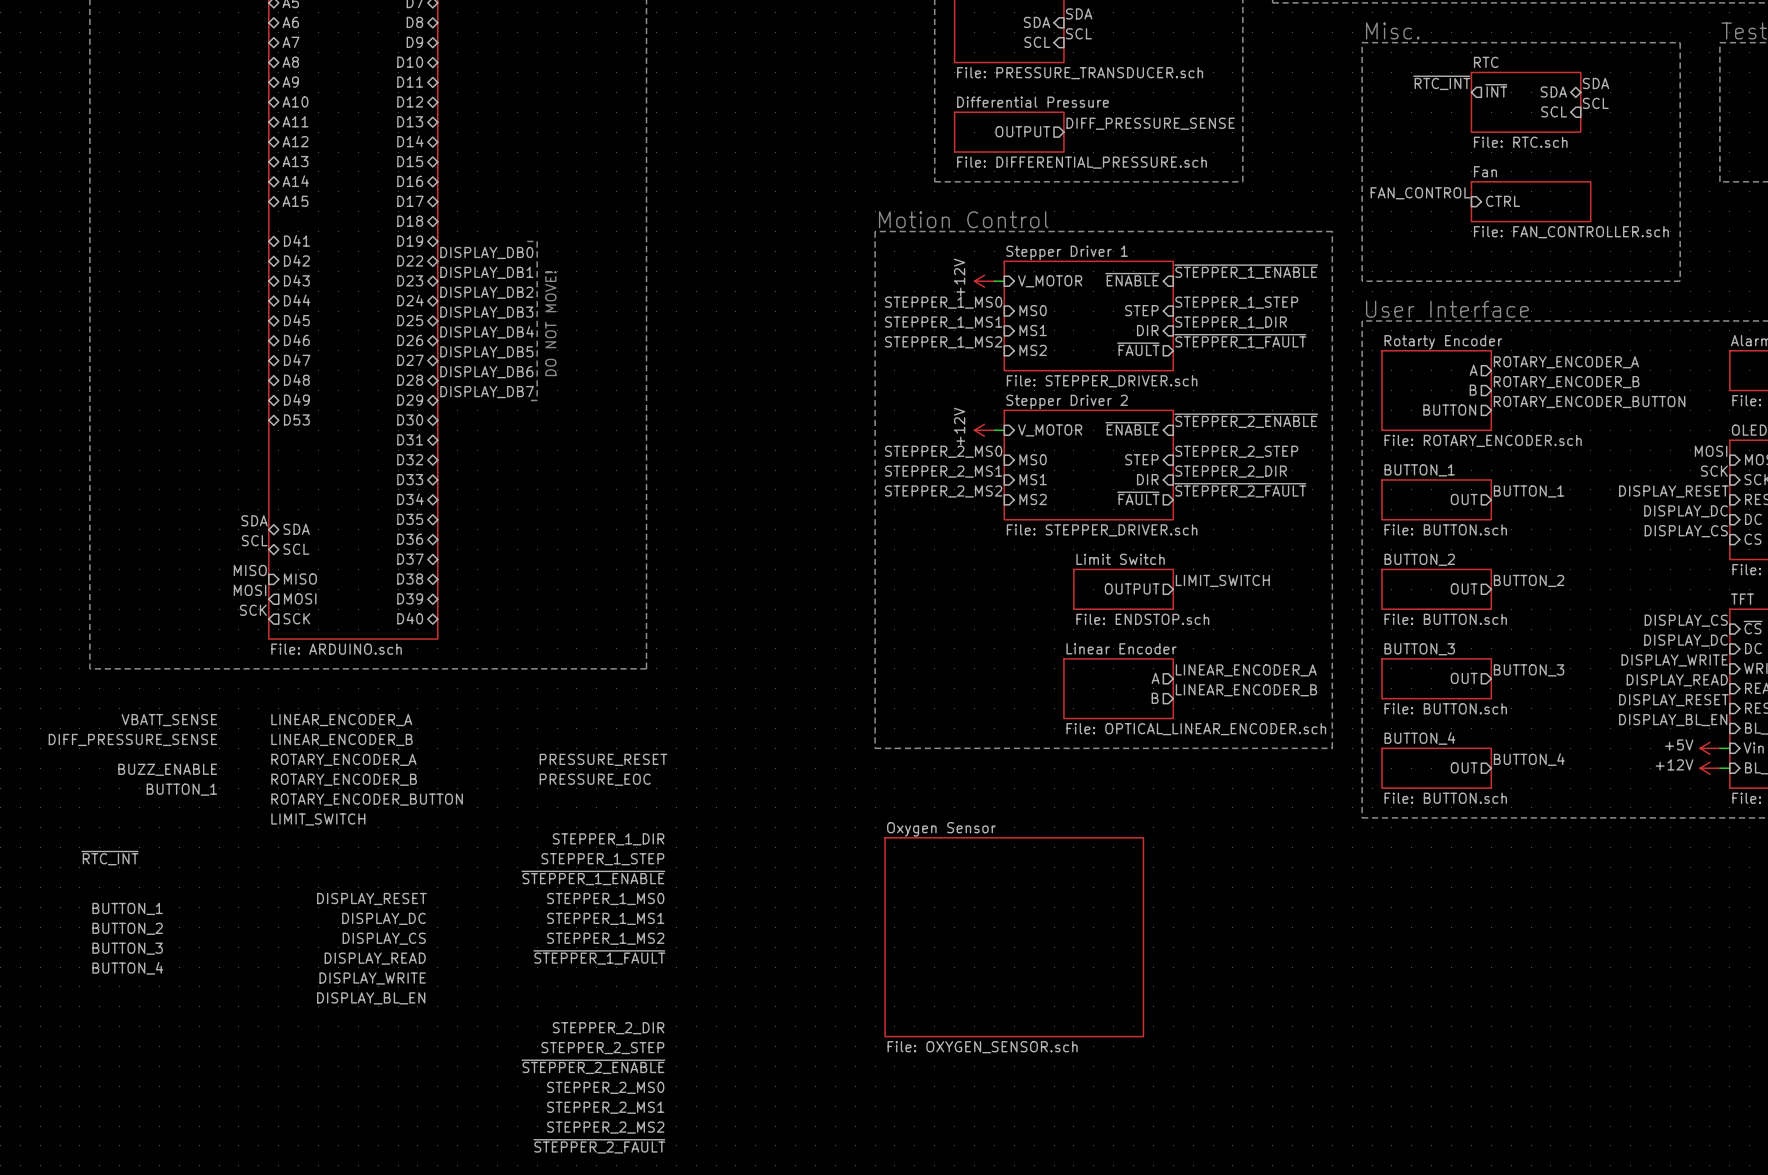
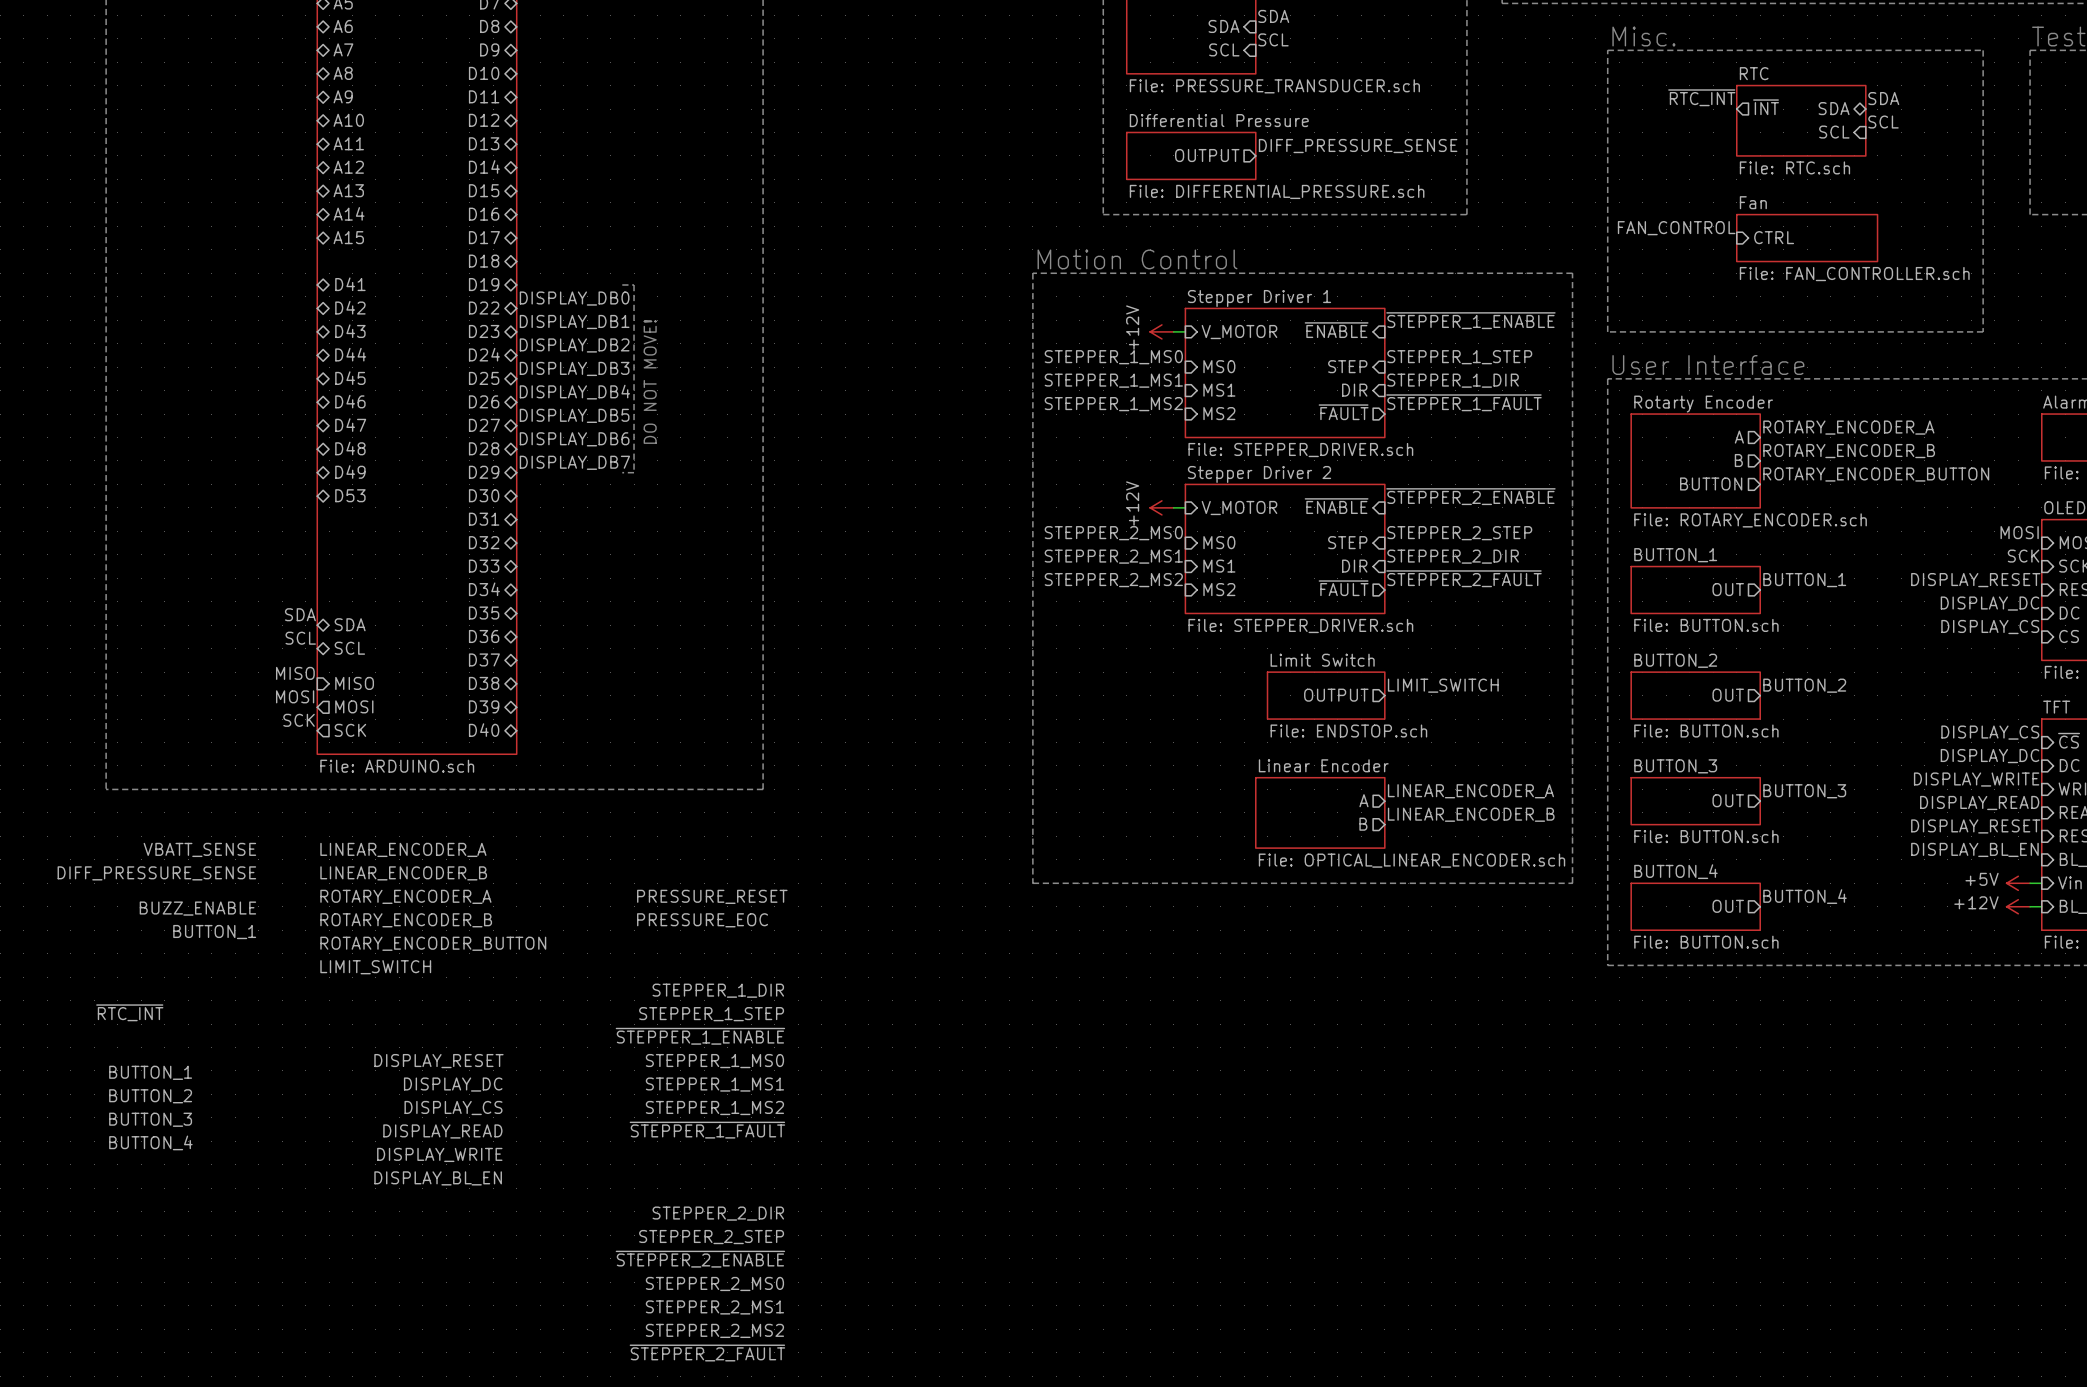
sheet Oxygen Sensor: File: OXYGEN_SENSOR.sch (1014, 937) -> none

